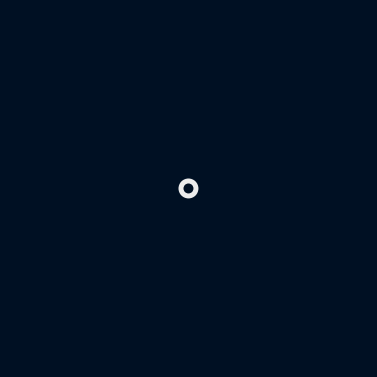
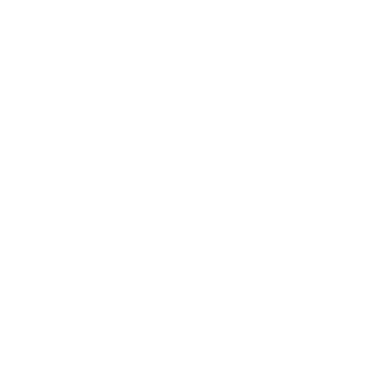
via: (188, 188) -> none

